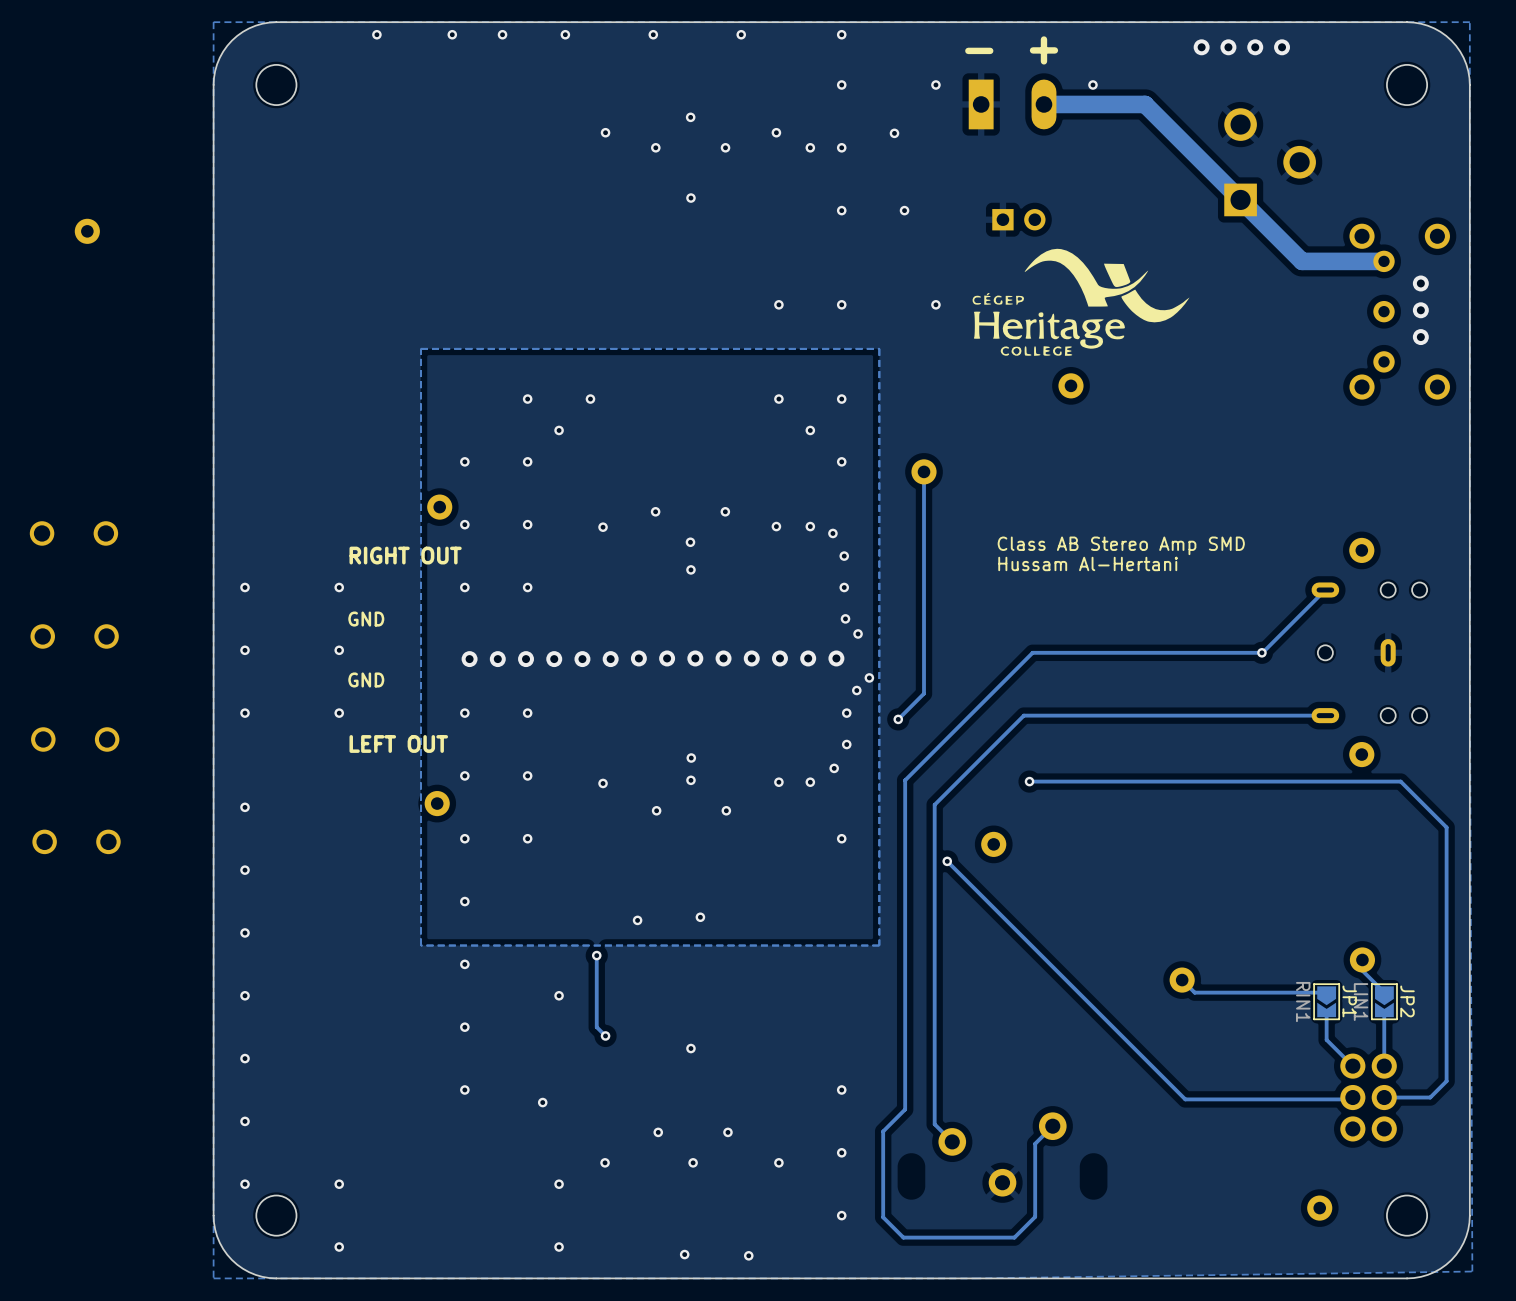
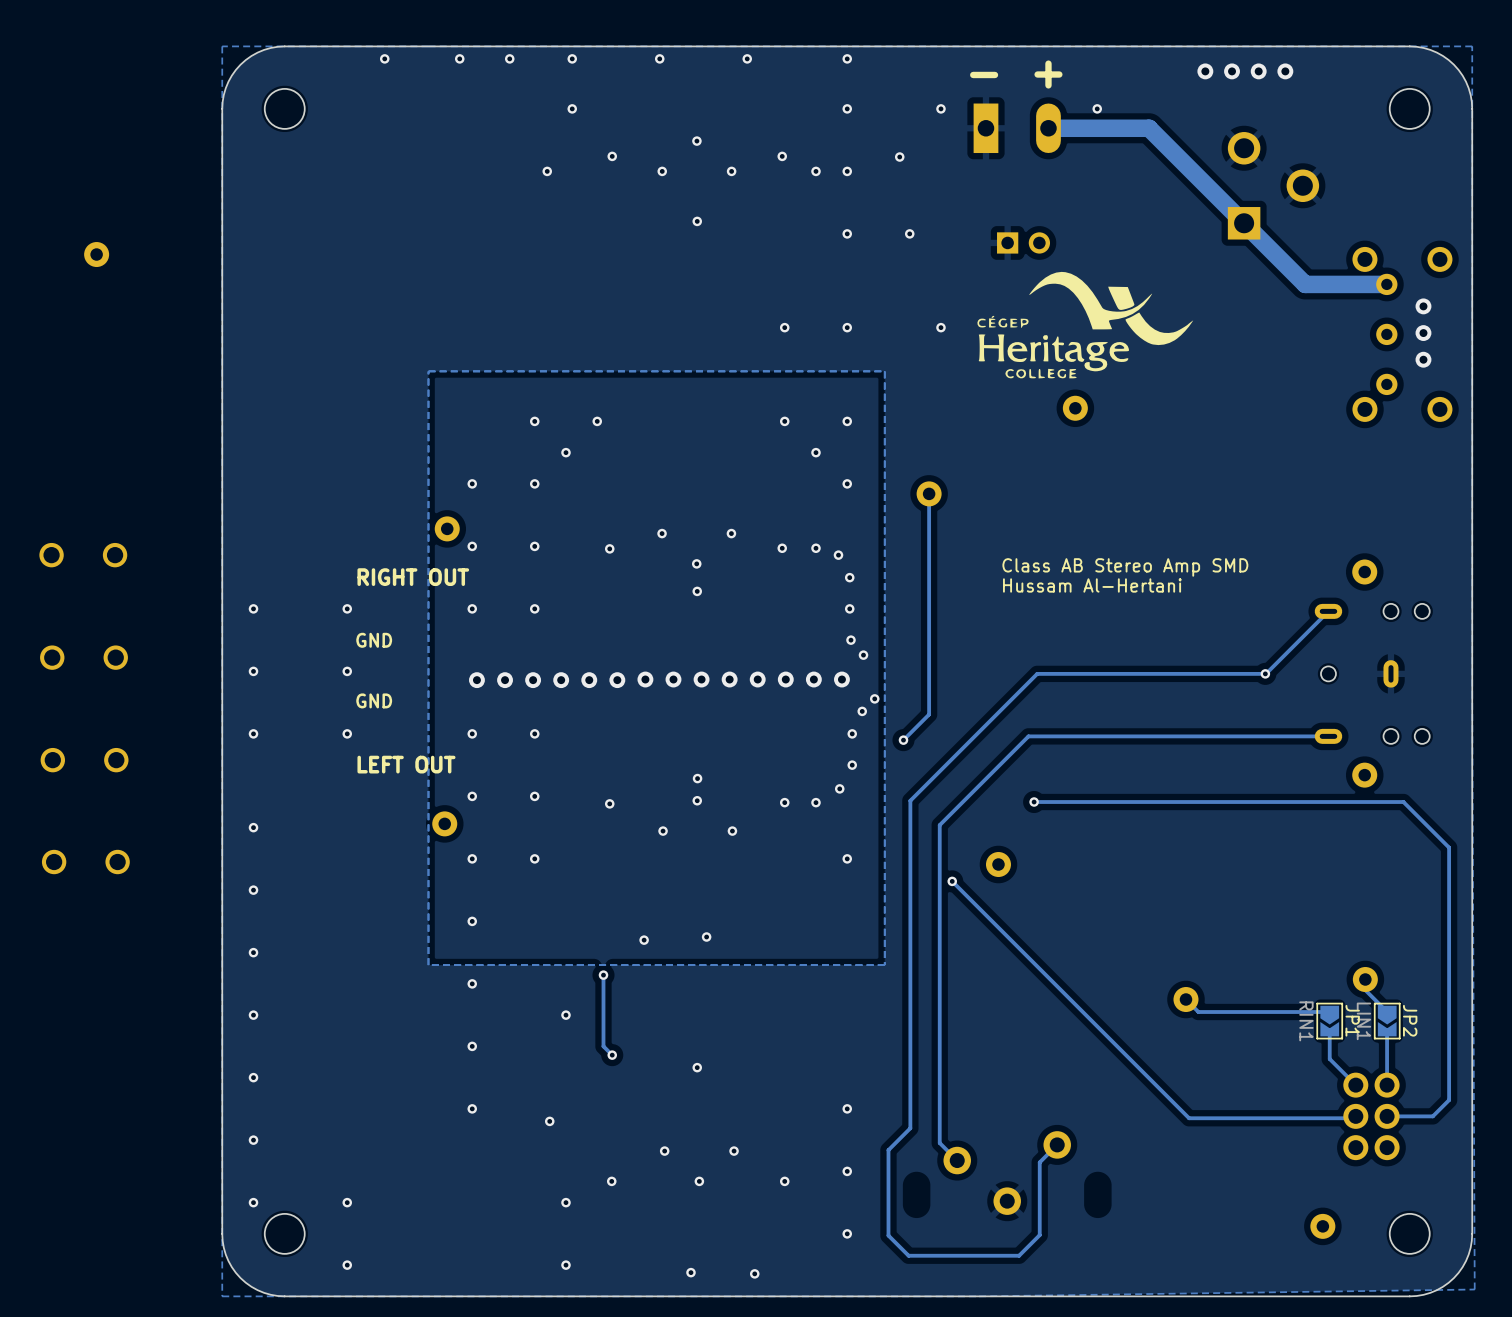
via: none -> (572, 108)
via: none -> (547, 171)

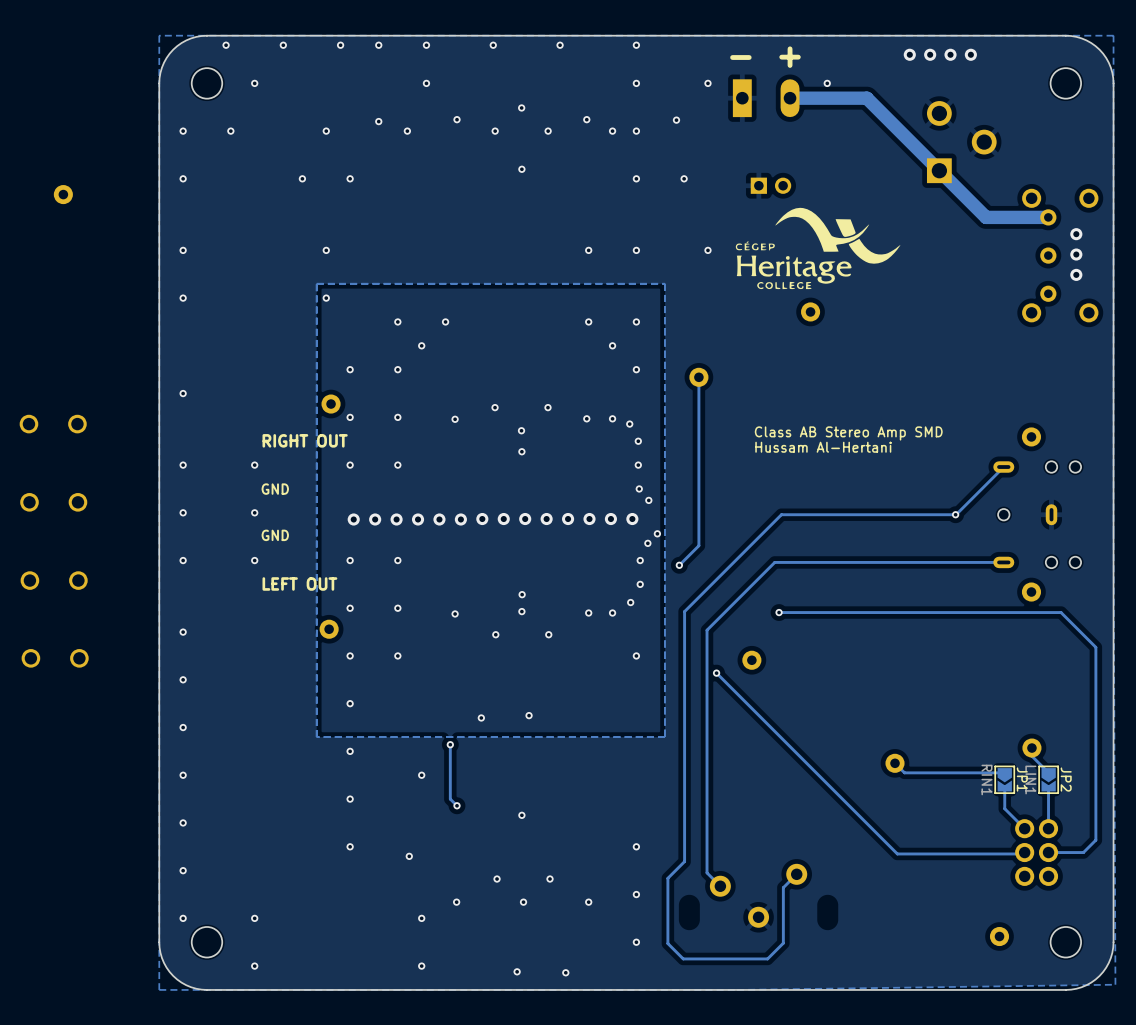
via: none -> (226, 45)
via: none -> (254, 83)
via: none -> (378, 121)
via: none -> (183, 131)
via: none -> (230, 131)
via: none -> (326, 131)
via: none -> (183, 178)
via: none -> (302, 178)
via: none -> (350, 178)
via: none -> (183, 250)
via: none -> (326, 250)
via: none -> (183, 298)
via: none -> (326, 298)
via: none -> (183, 393)

